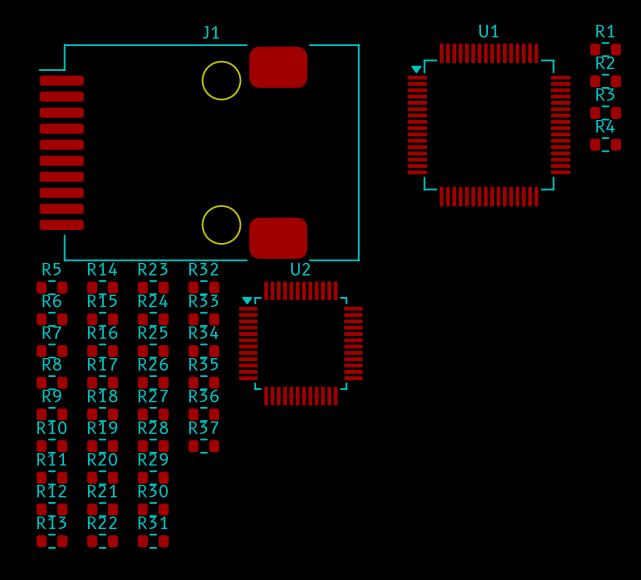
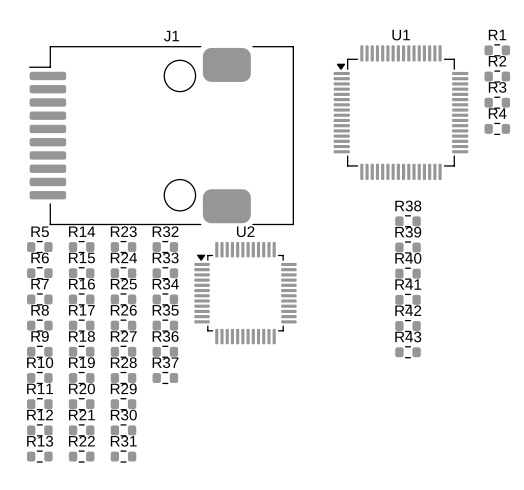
R38: none -> (408, 221)
R39: none -> (408, 247)
R40: none -> (408, 273)
R41: none -> (408, 299)
R42: none -> (408, 326)
R43: none -> (408, 352)

